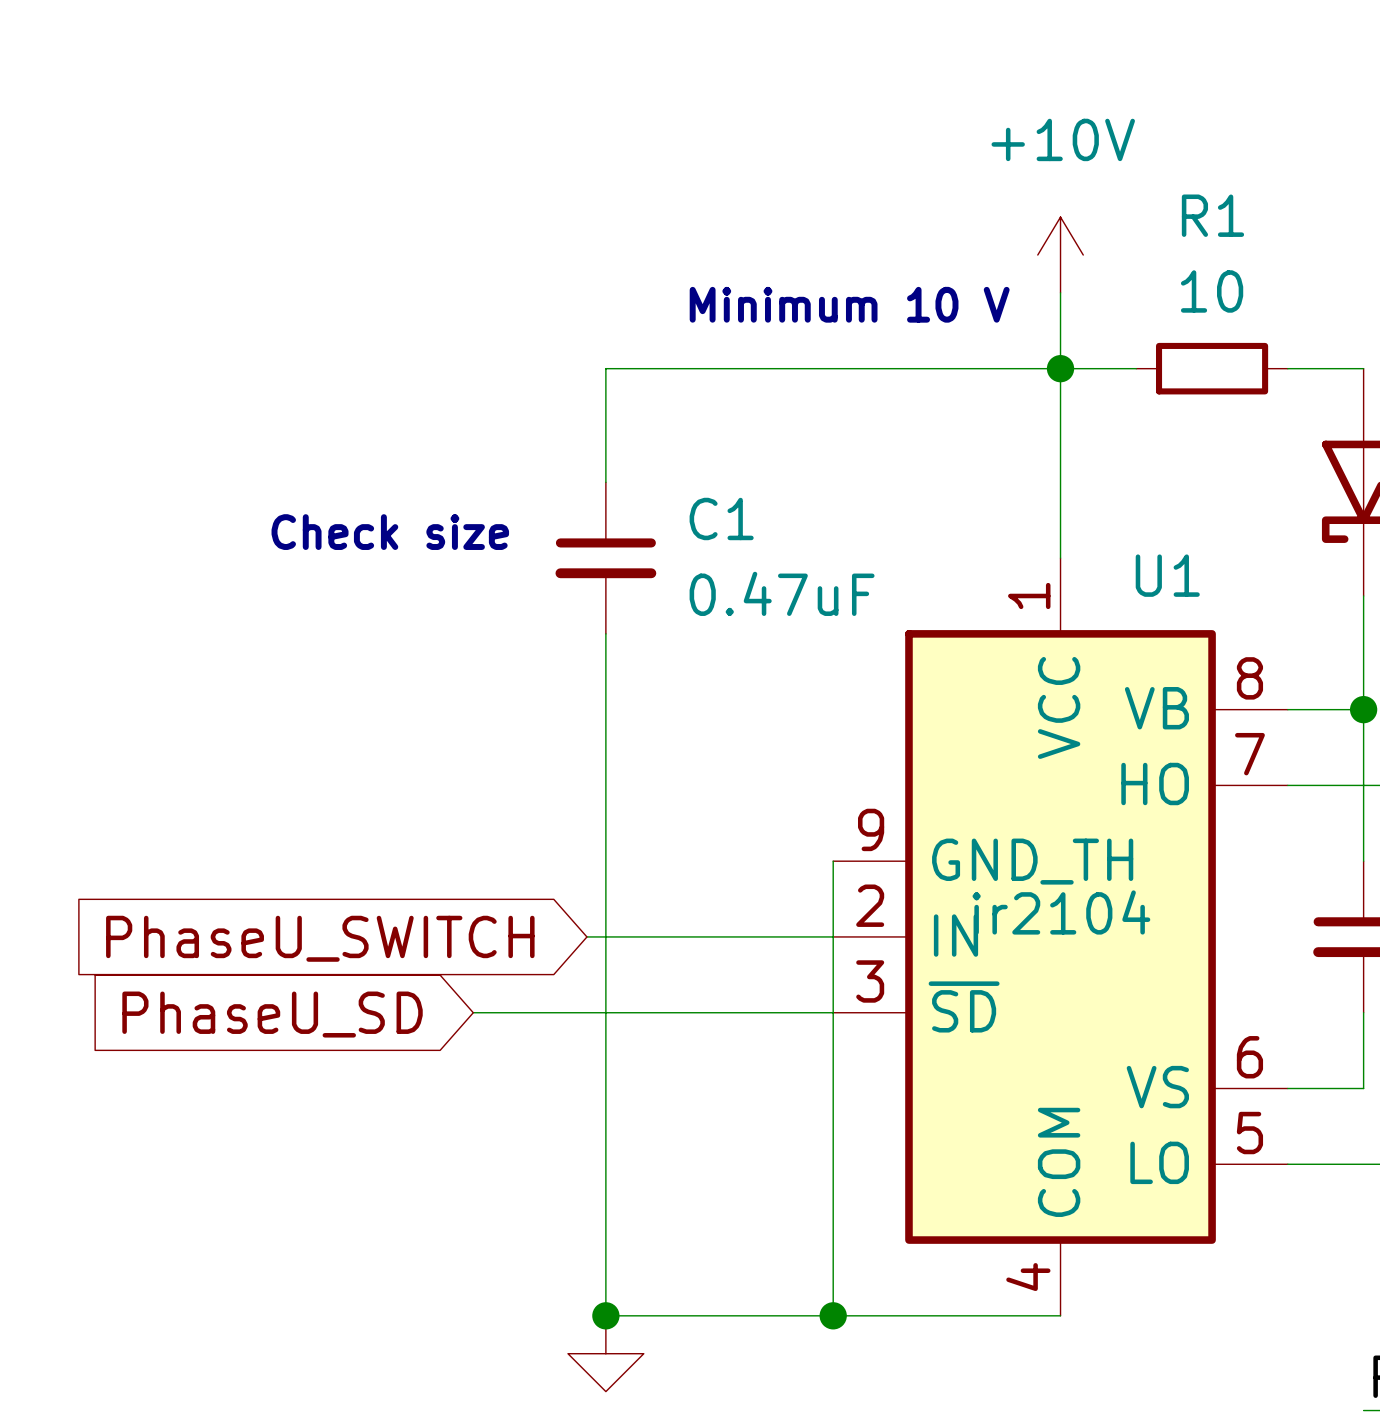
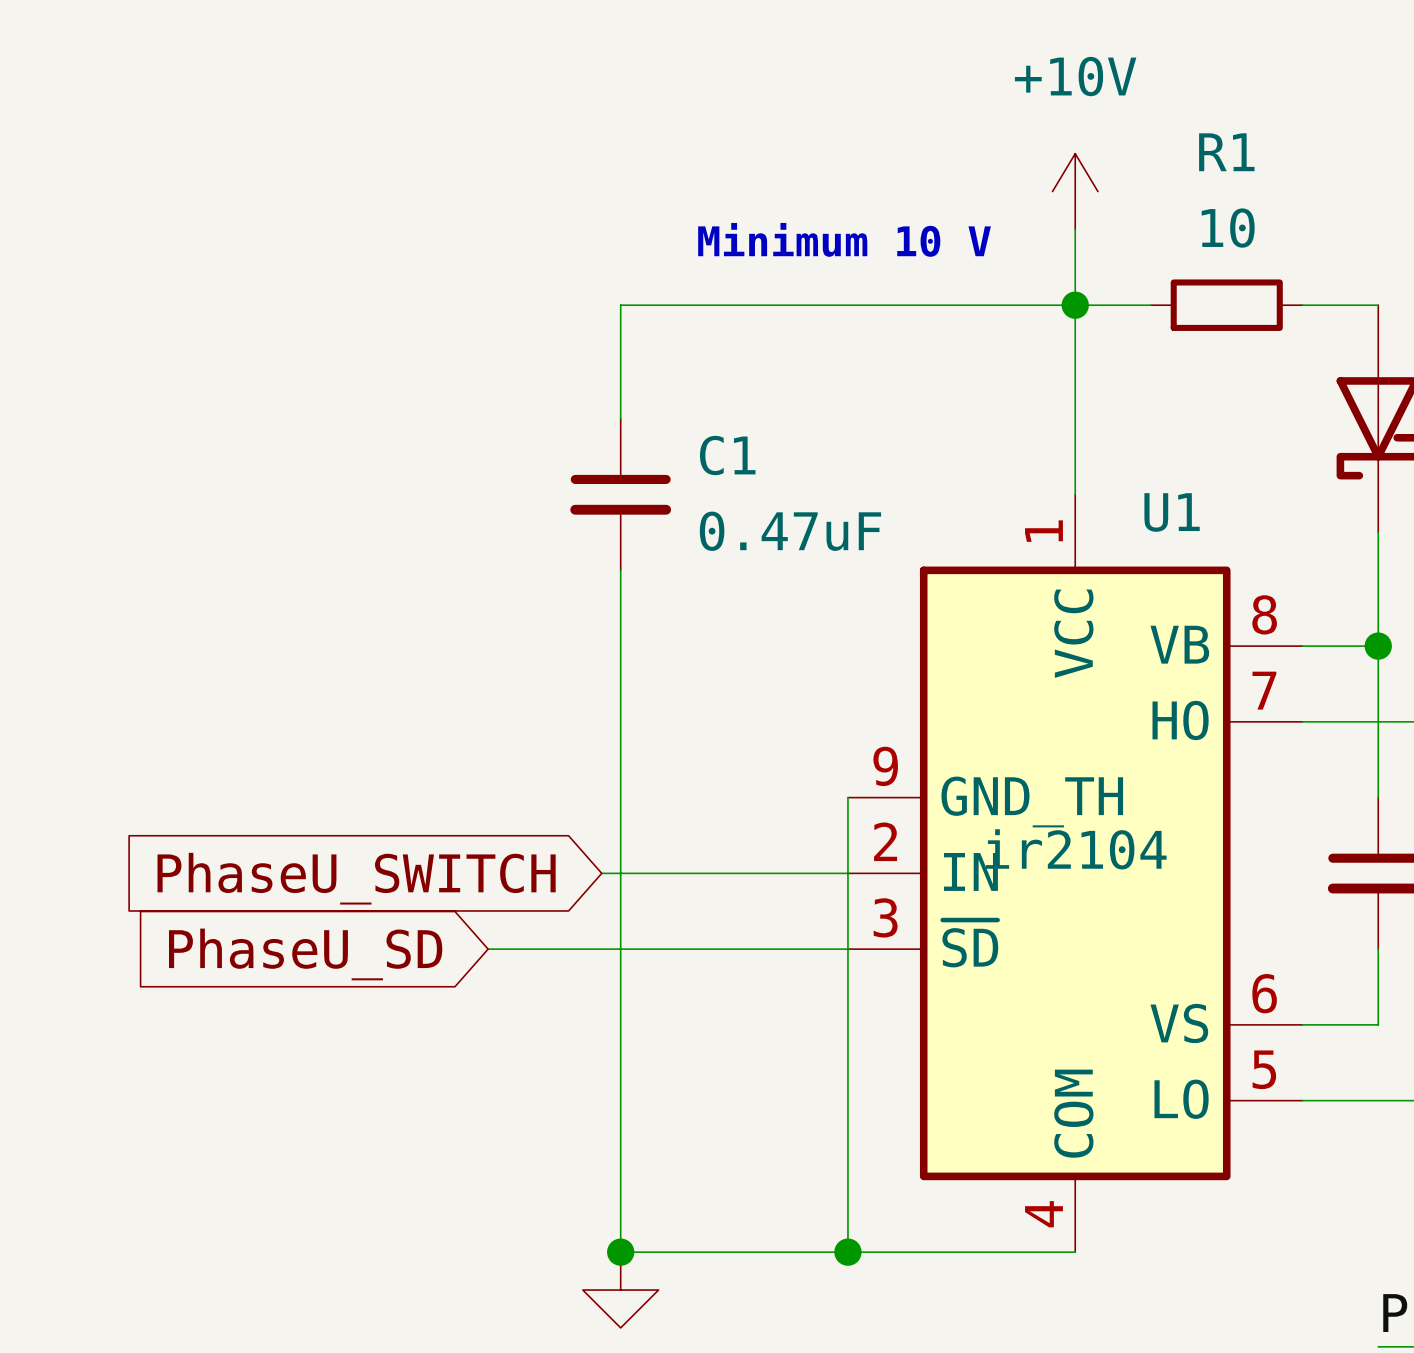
text: Check size (390, 532) -> none

